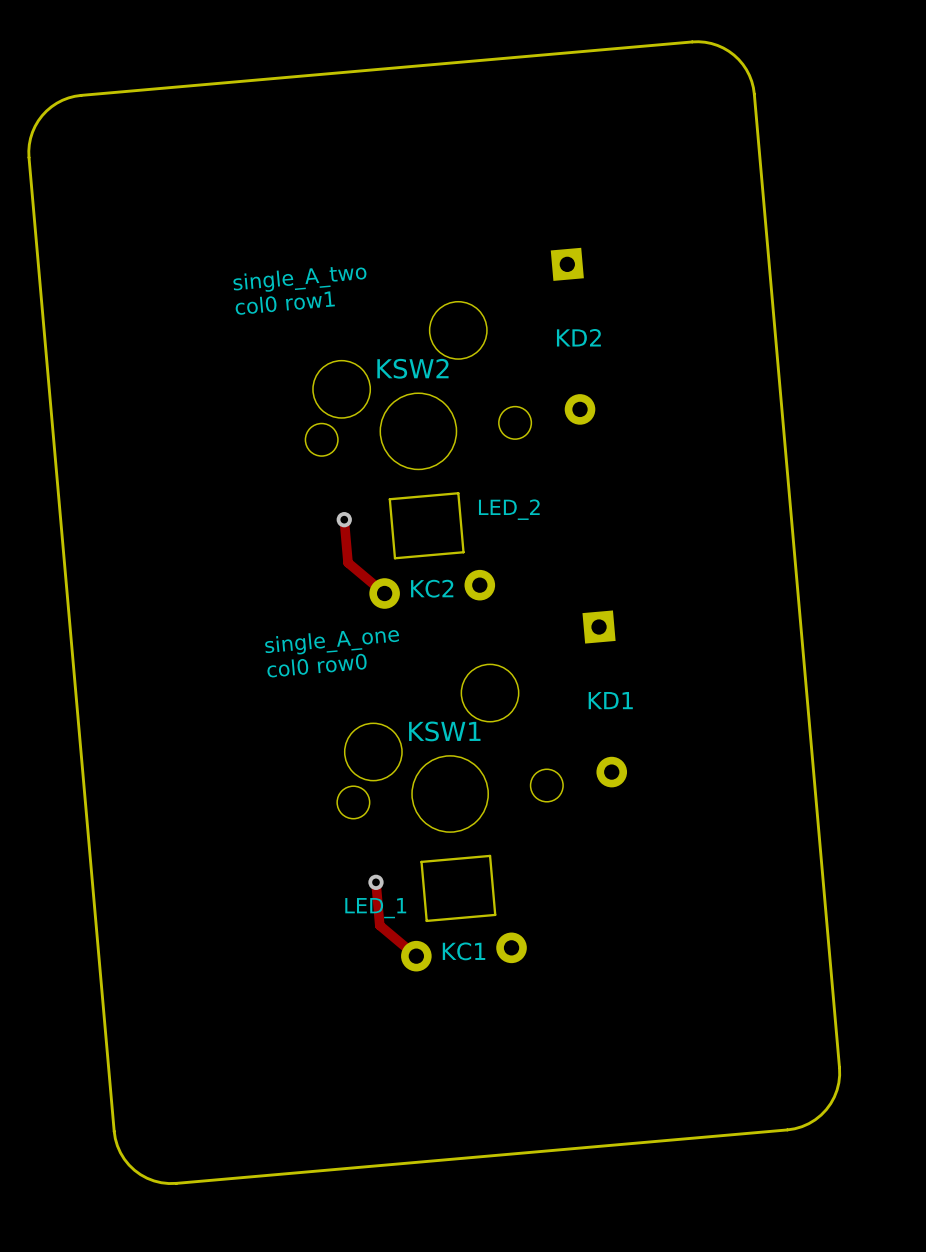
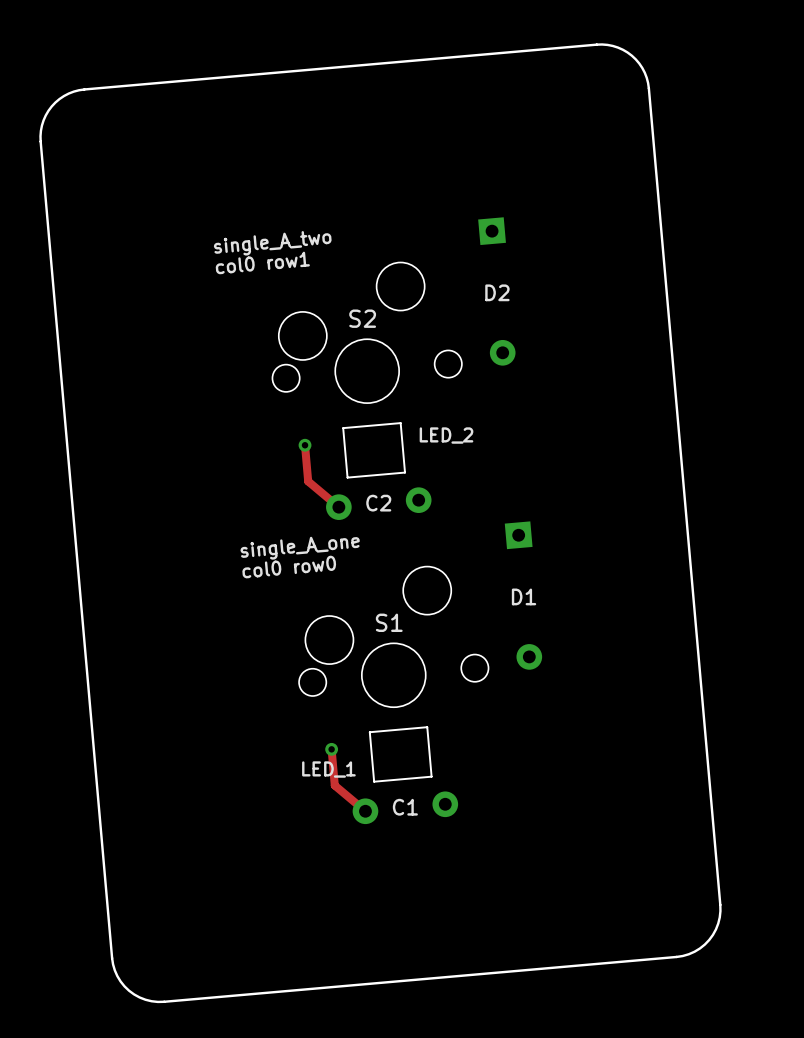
text: KD2 (578, 337) -> D2 (497, 292)
KSW2 name: KSW2 (412, 368) -> S2 (362, 318)
text: KC2 (432, 588) -> C2 (378, 503)
text: KD1 (610, 700) -> D1 (524, 596)
KSW1 name: KSW1 (444, 731) -> S1 (389, 622)
text: KC1 (464, 951) -> C1 (405, 807)

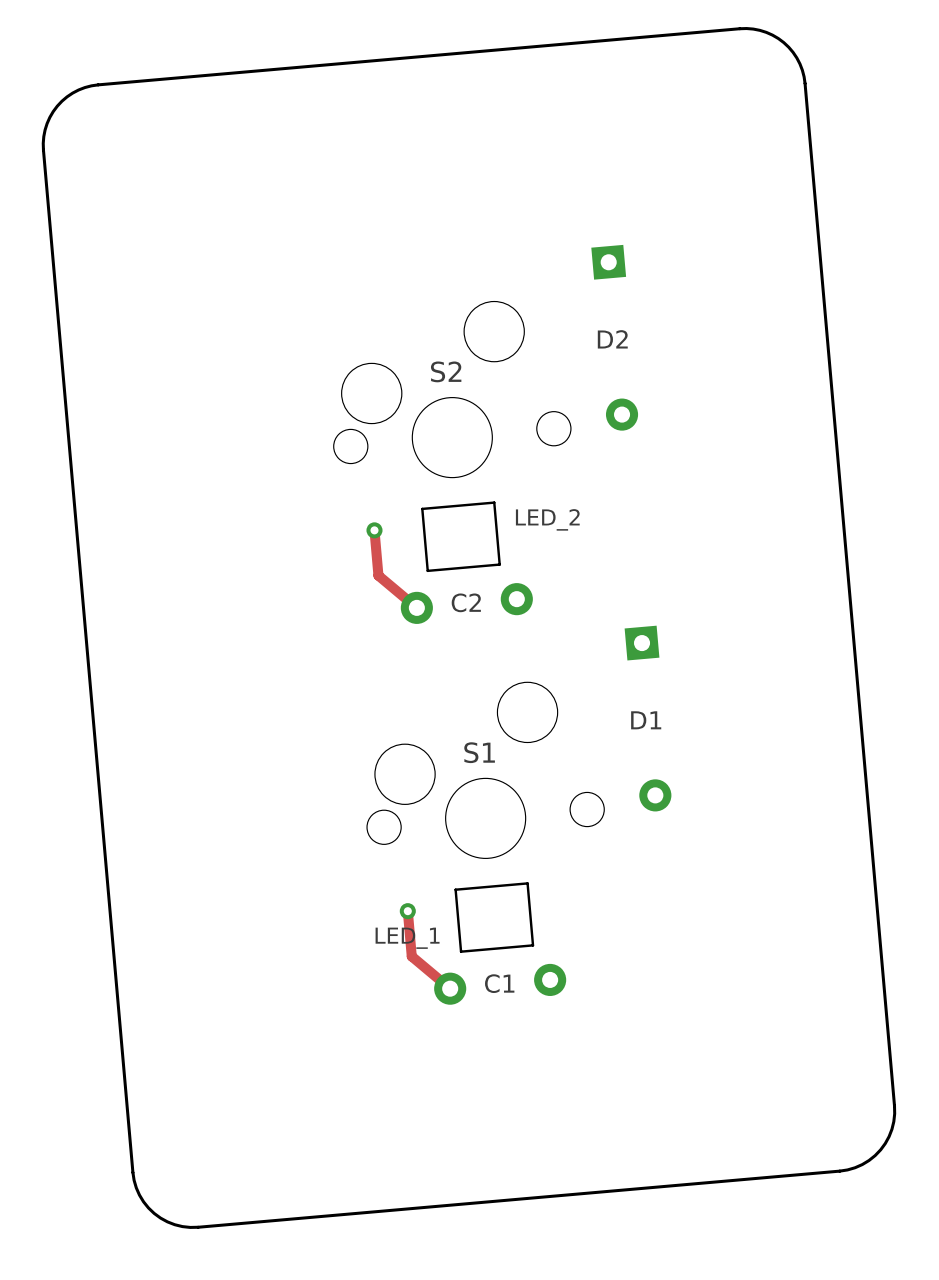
text: single_A_two (272, 243) -> none
text: col0 row1 (262, 262) -> none
text: single_A_one (300, 548) -> none
text: col0 row0 (289, 567) -> none

